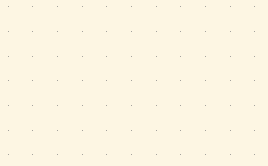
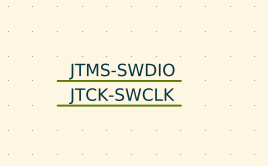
label: none -> JTMS-SWDIO (121, 71)
wire: none -> (57, 80) (180, 80)
label: none -> JTCK-SWCLK (121, 96)
wire: none -> (57, 105) (180, 105)

